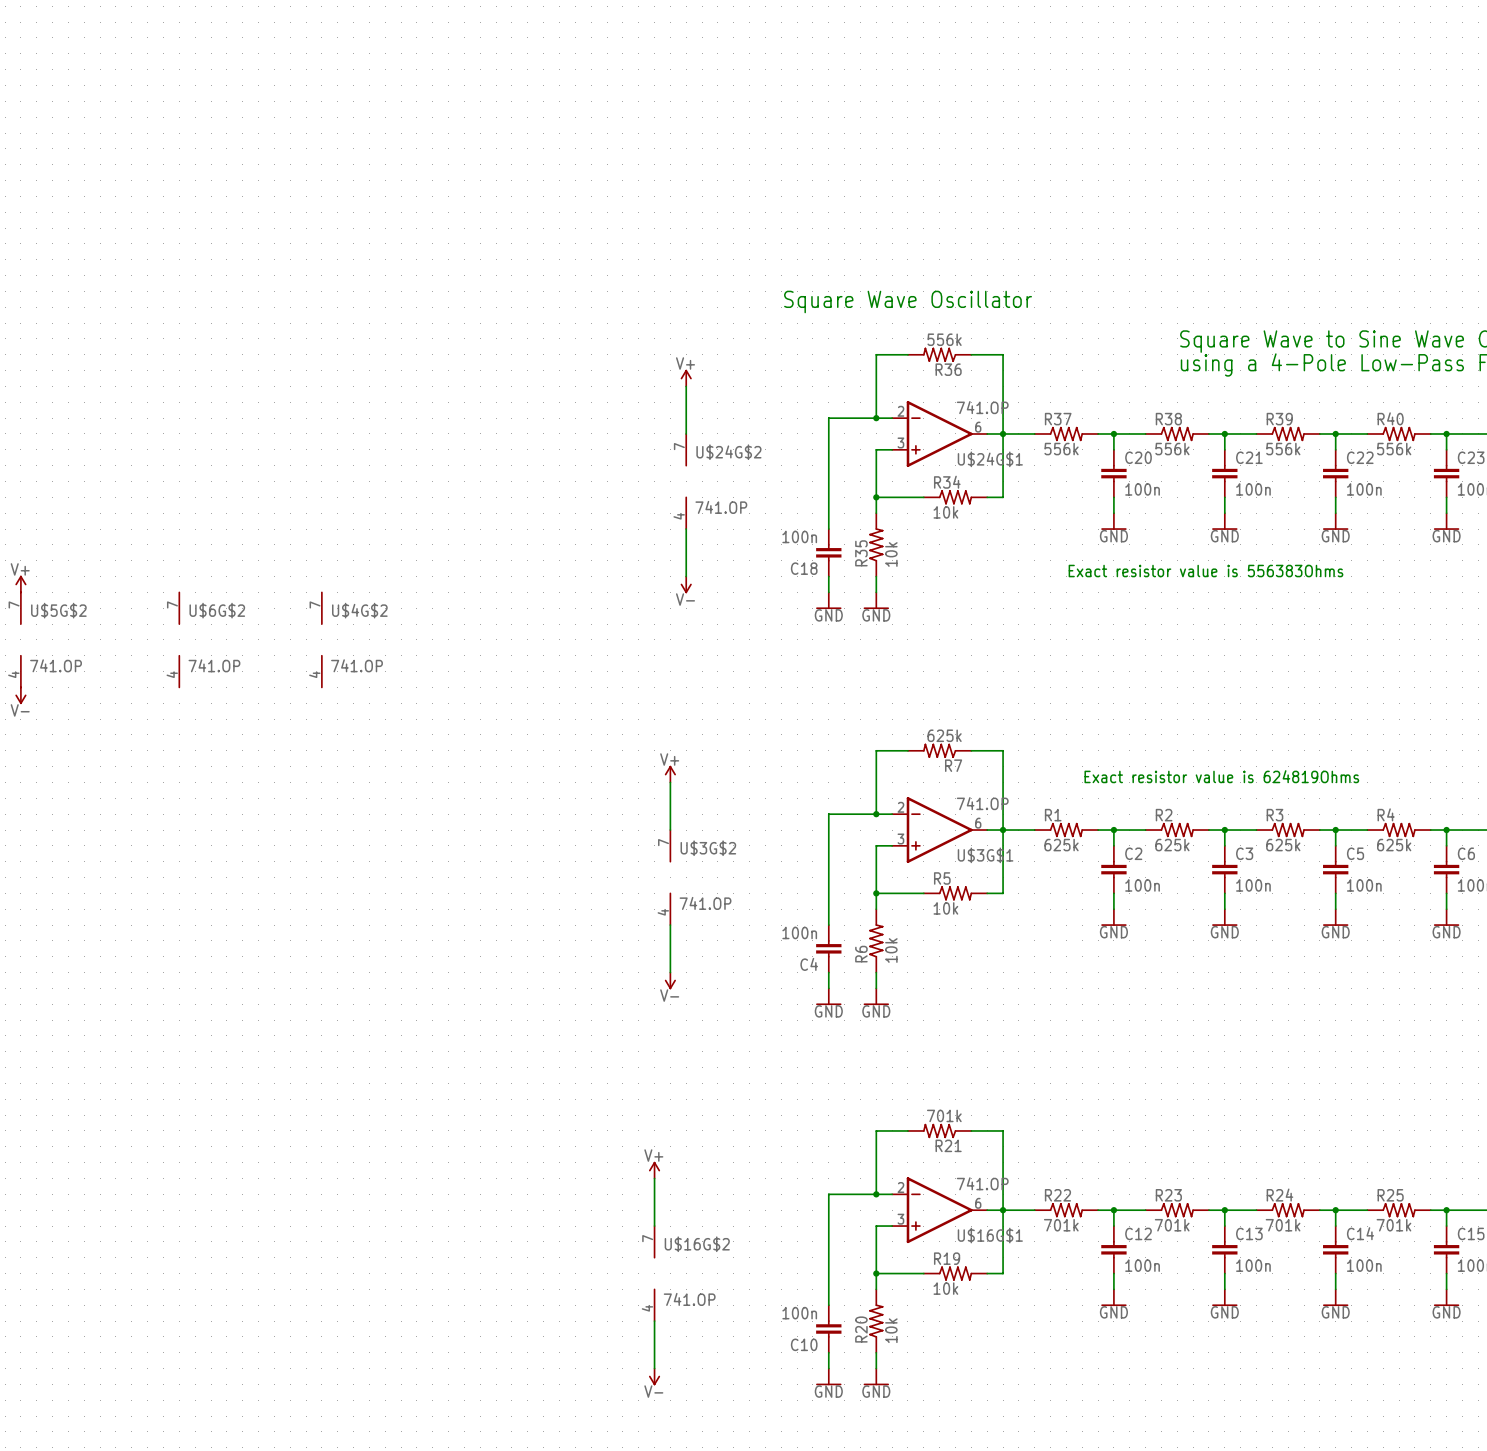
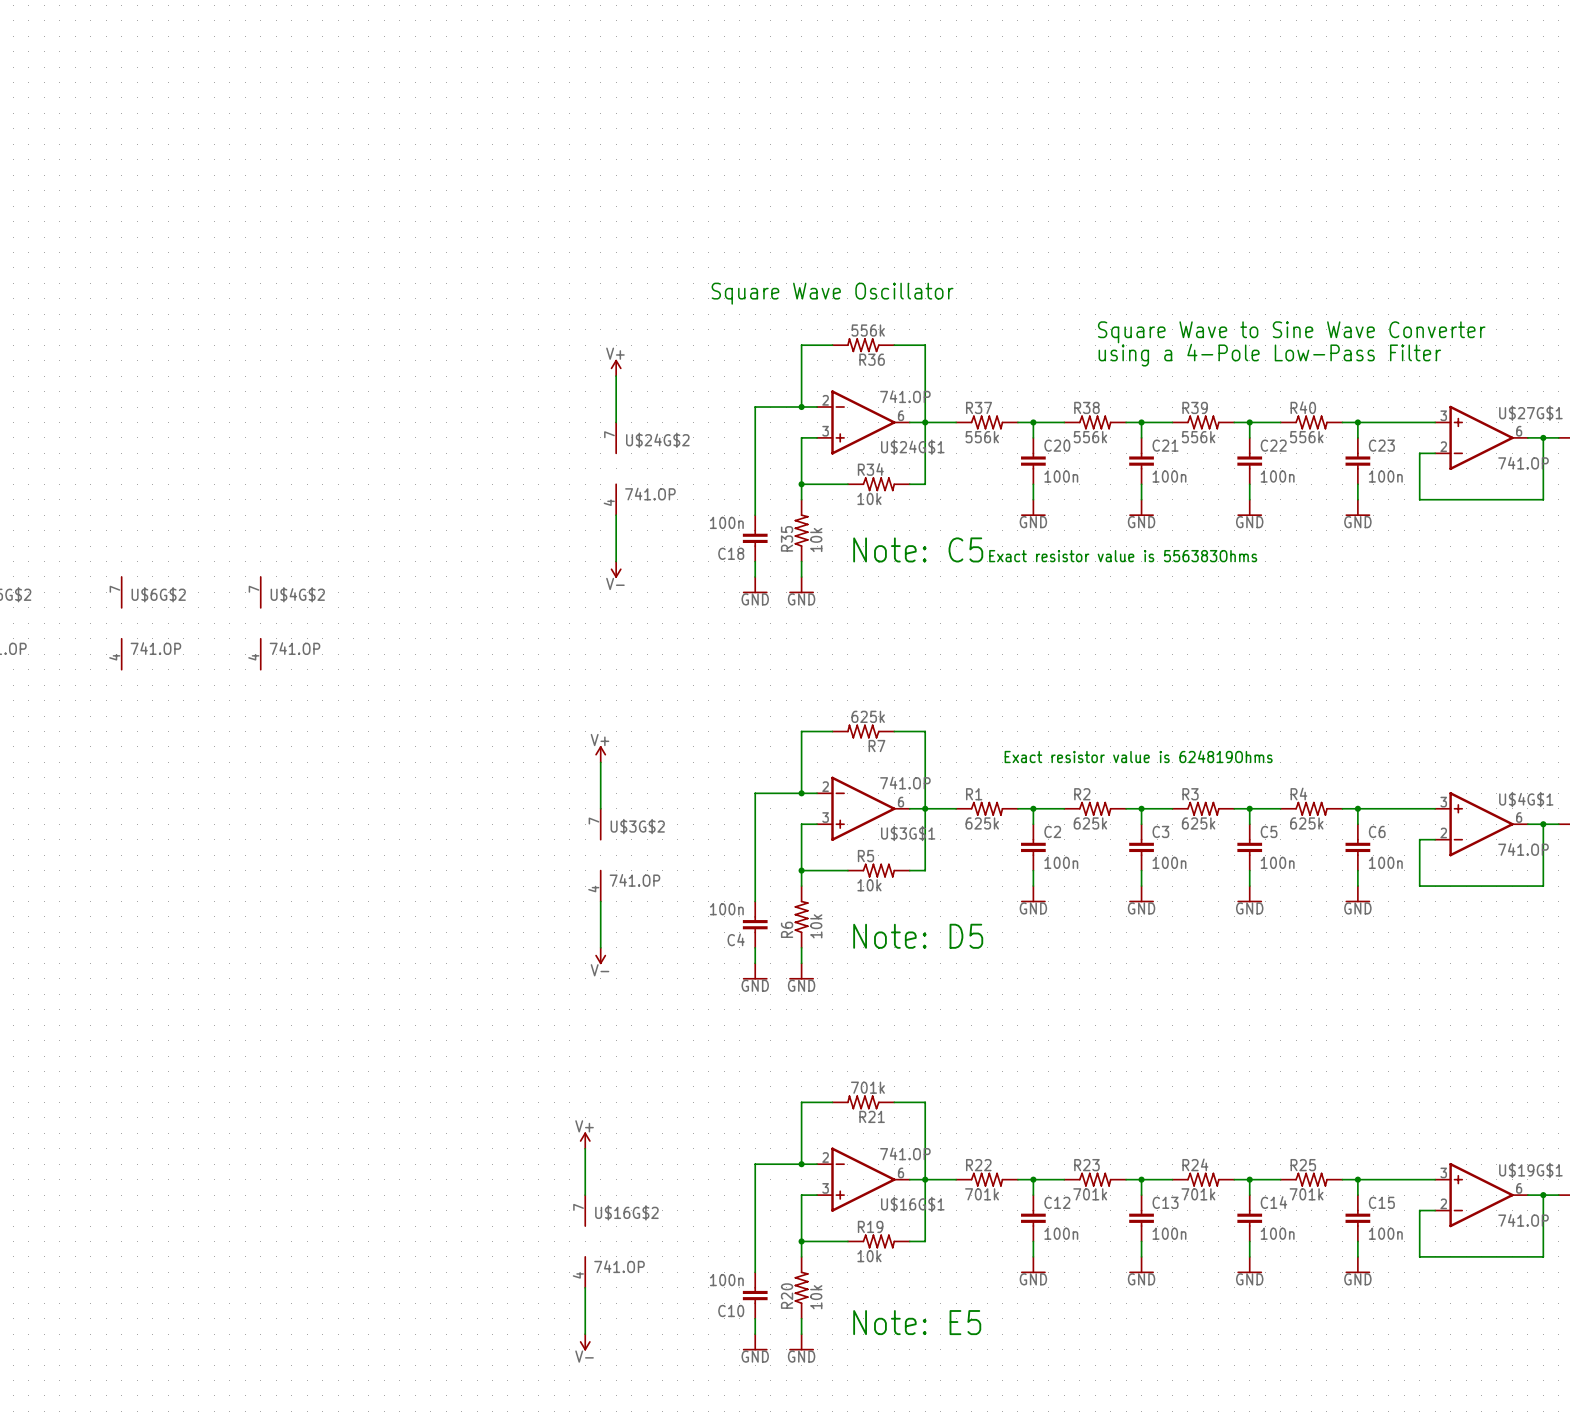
text: none -> Note: C5 (918, 549)
text: none -> Note: D5 (918, 936)
text: none -> Note: E5 (917, 1322)

